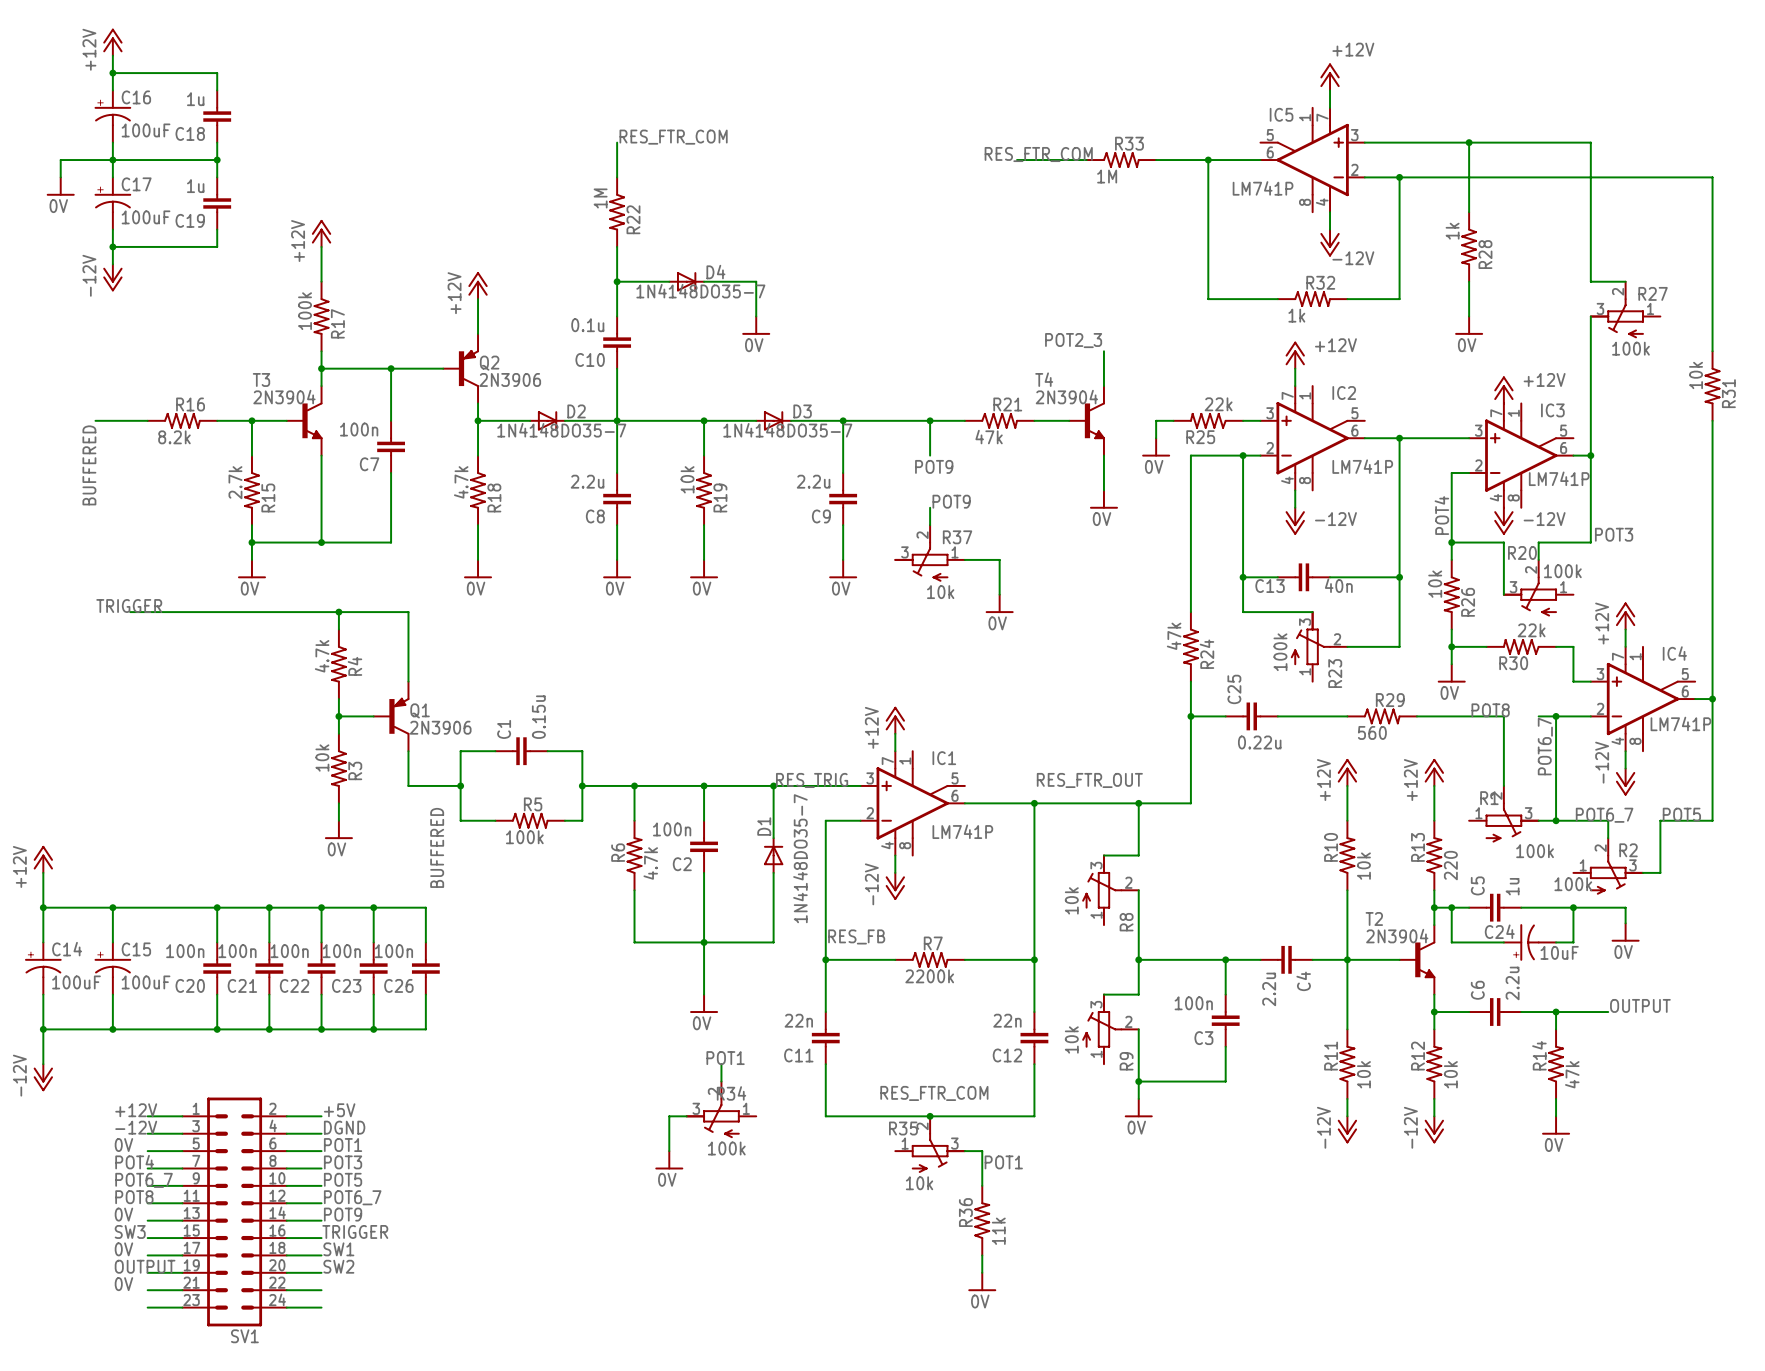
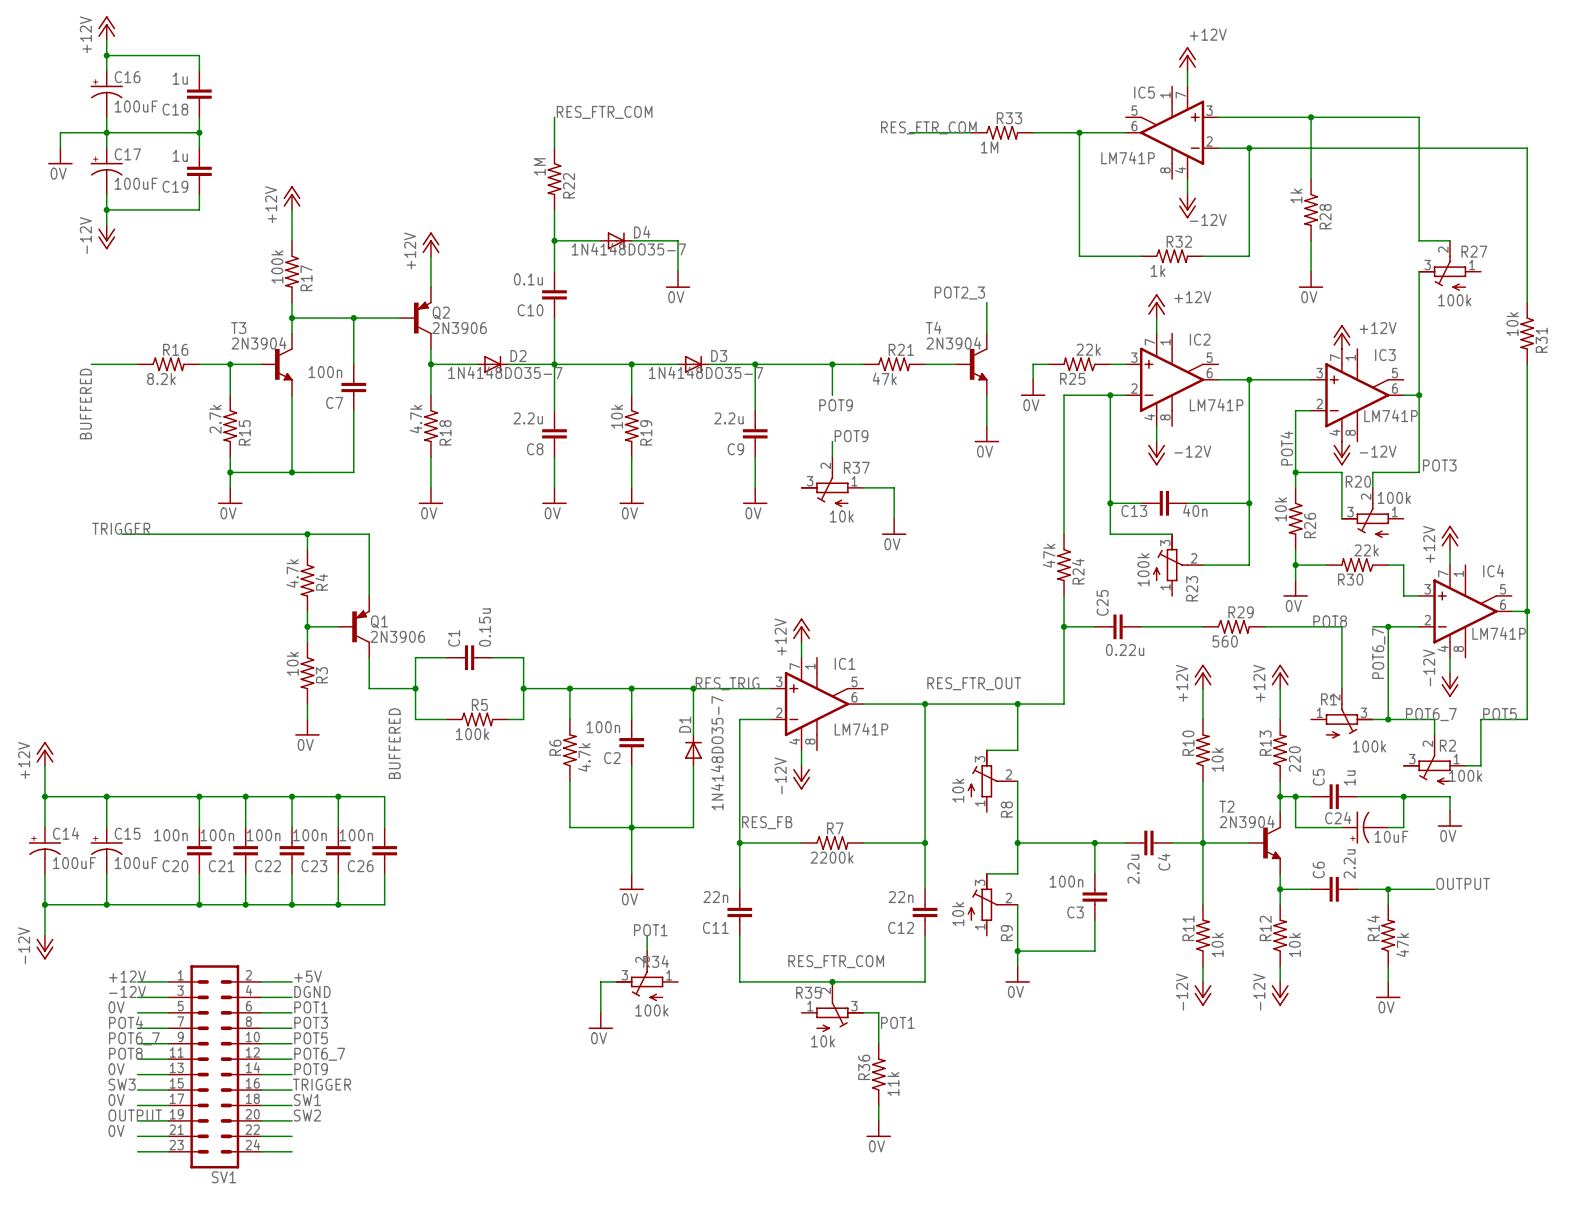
R2 flip: as is (1616, 874) -> left-right (1427, 767)

